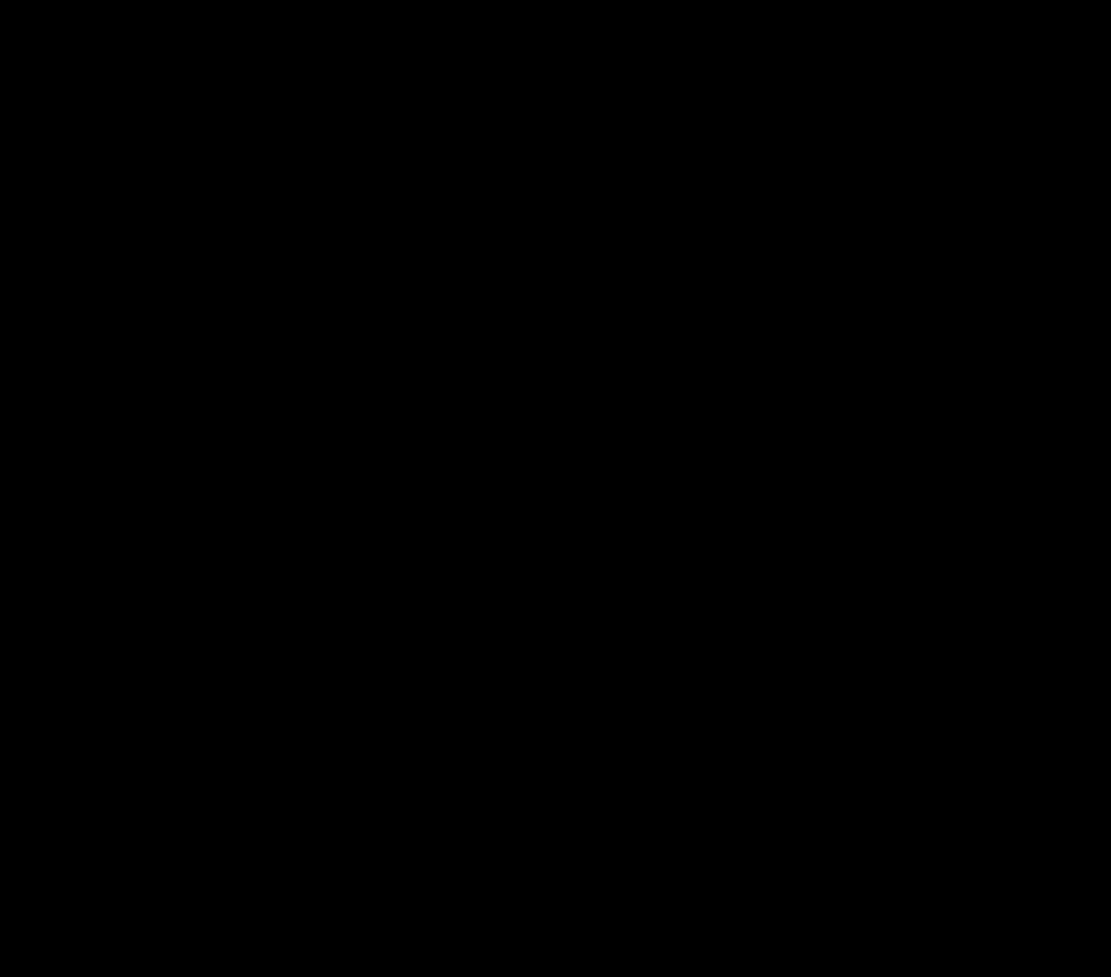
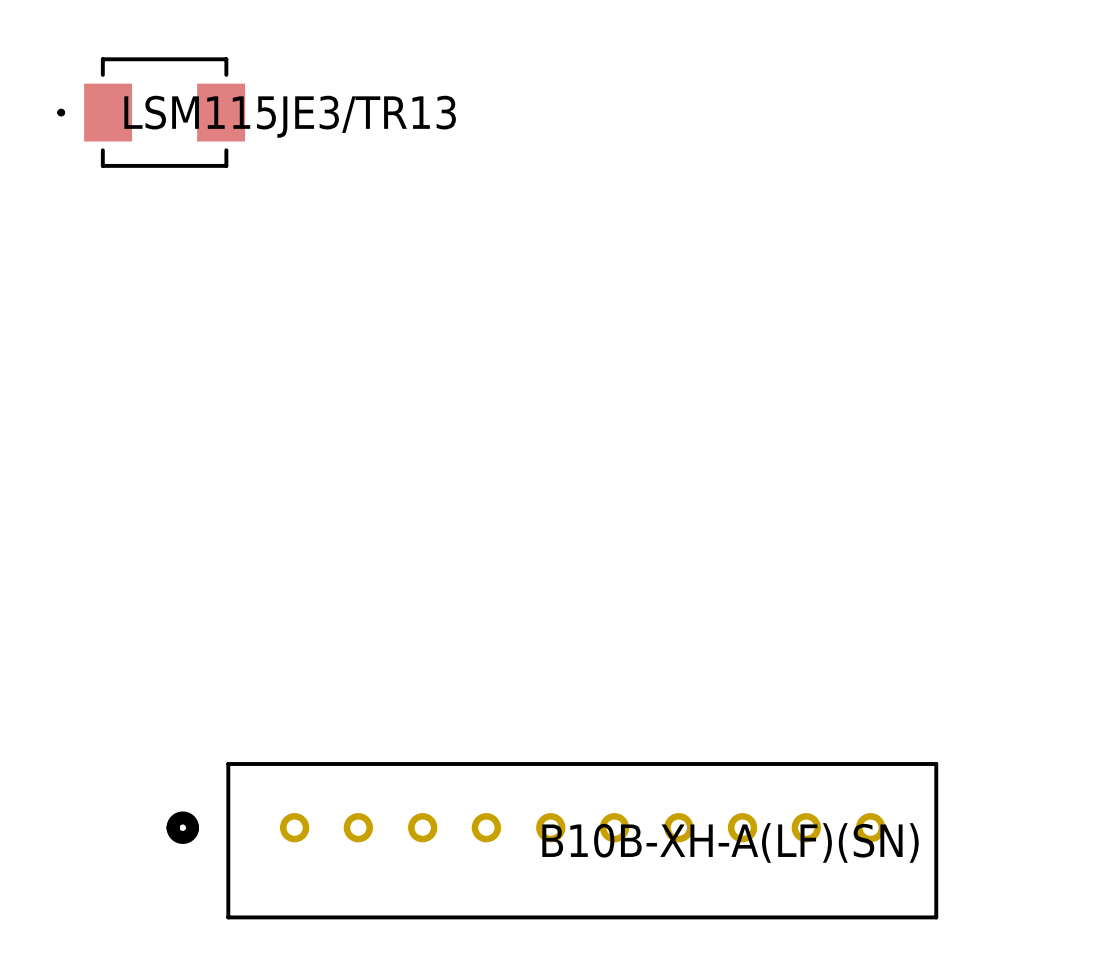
part: none -> LSM115JE3/TR13 (151, 112)
part: none -> B10B-XH-A(LF)(SN) (552, 840)

